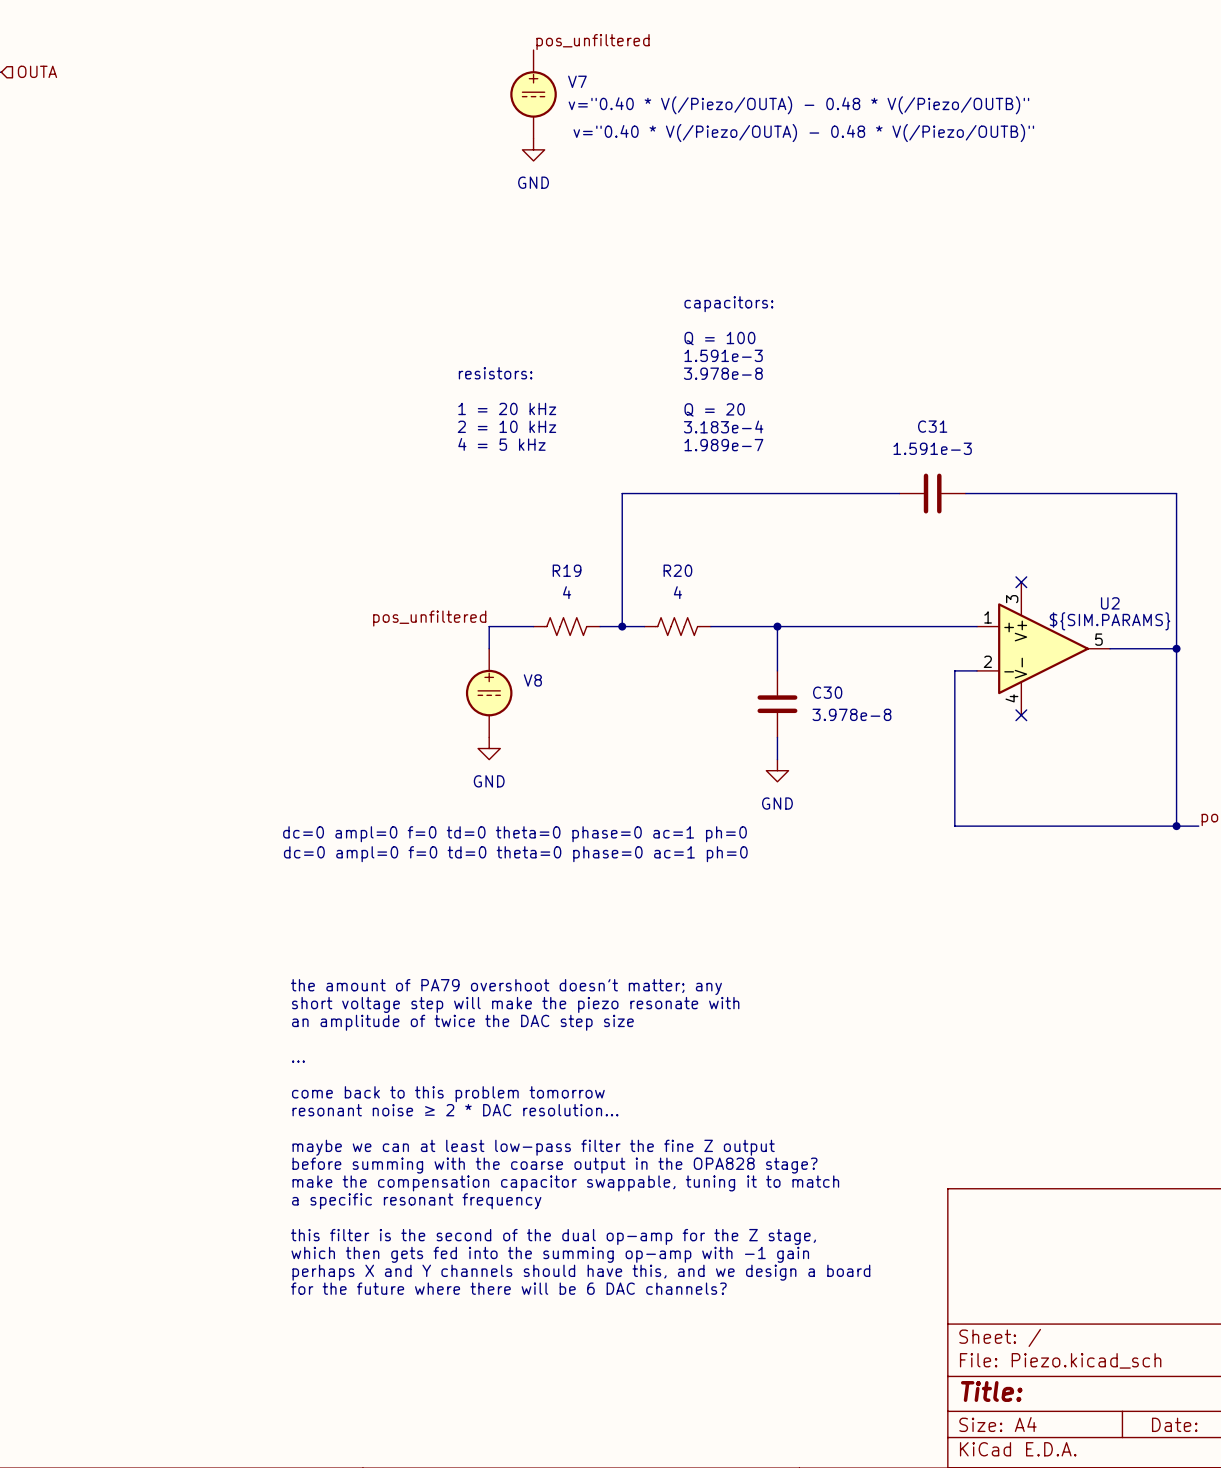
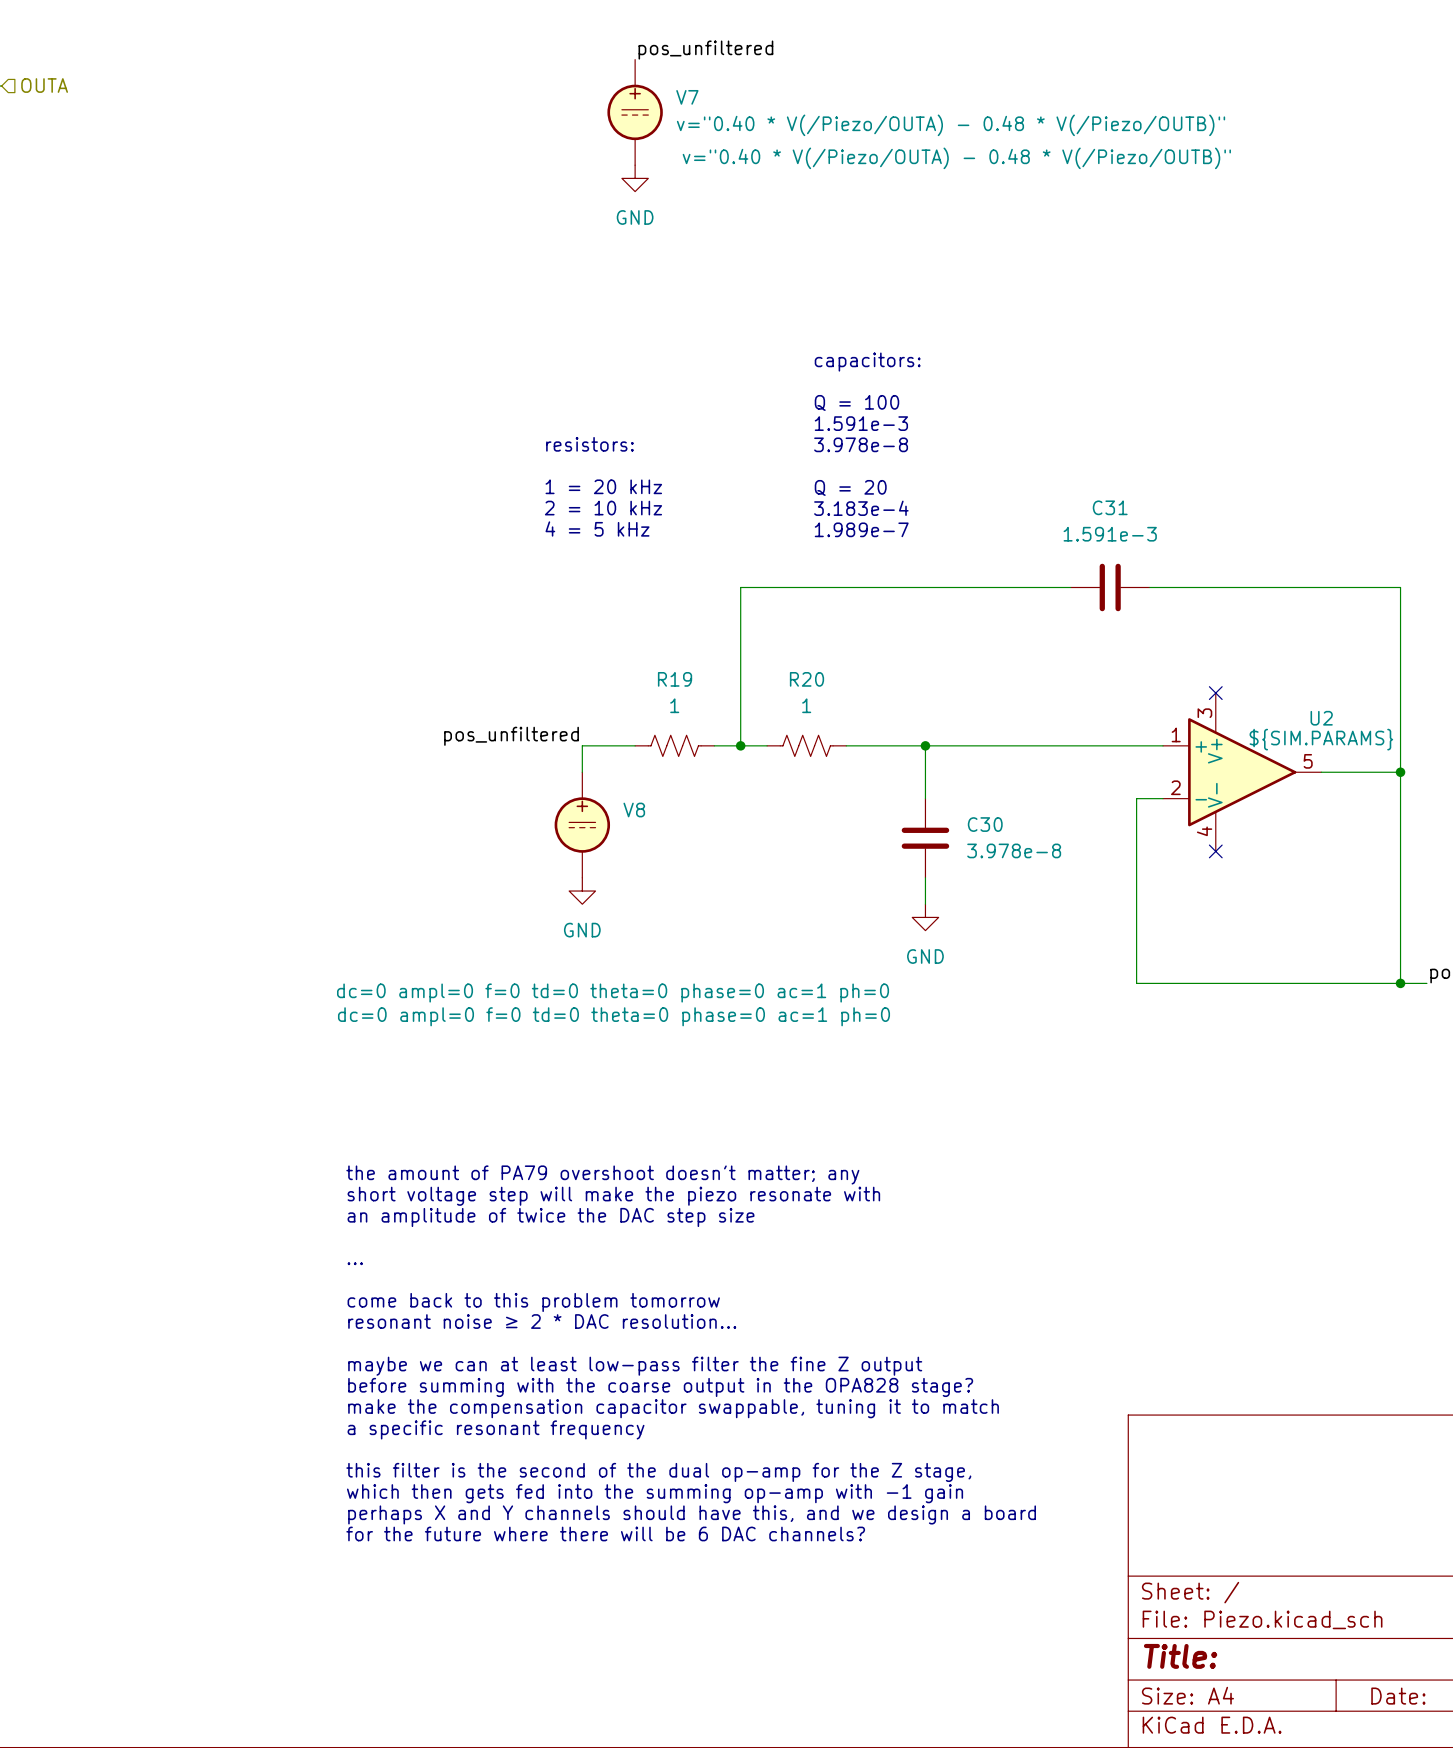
R19 value: 4 (567, 592) -> 1 (674, 705)
R20 value: 4 (677, 592) -> 1 (806, 705)

